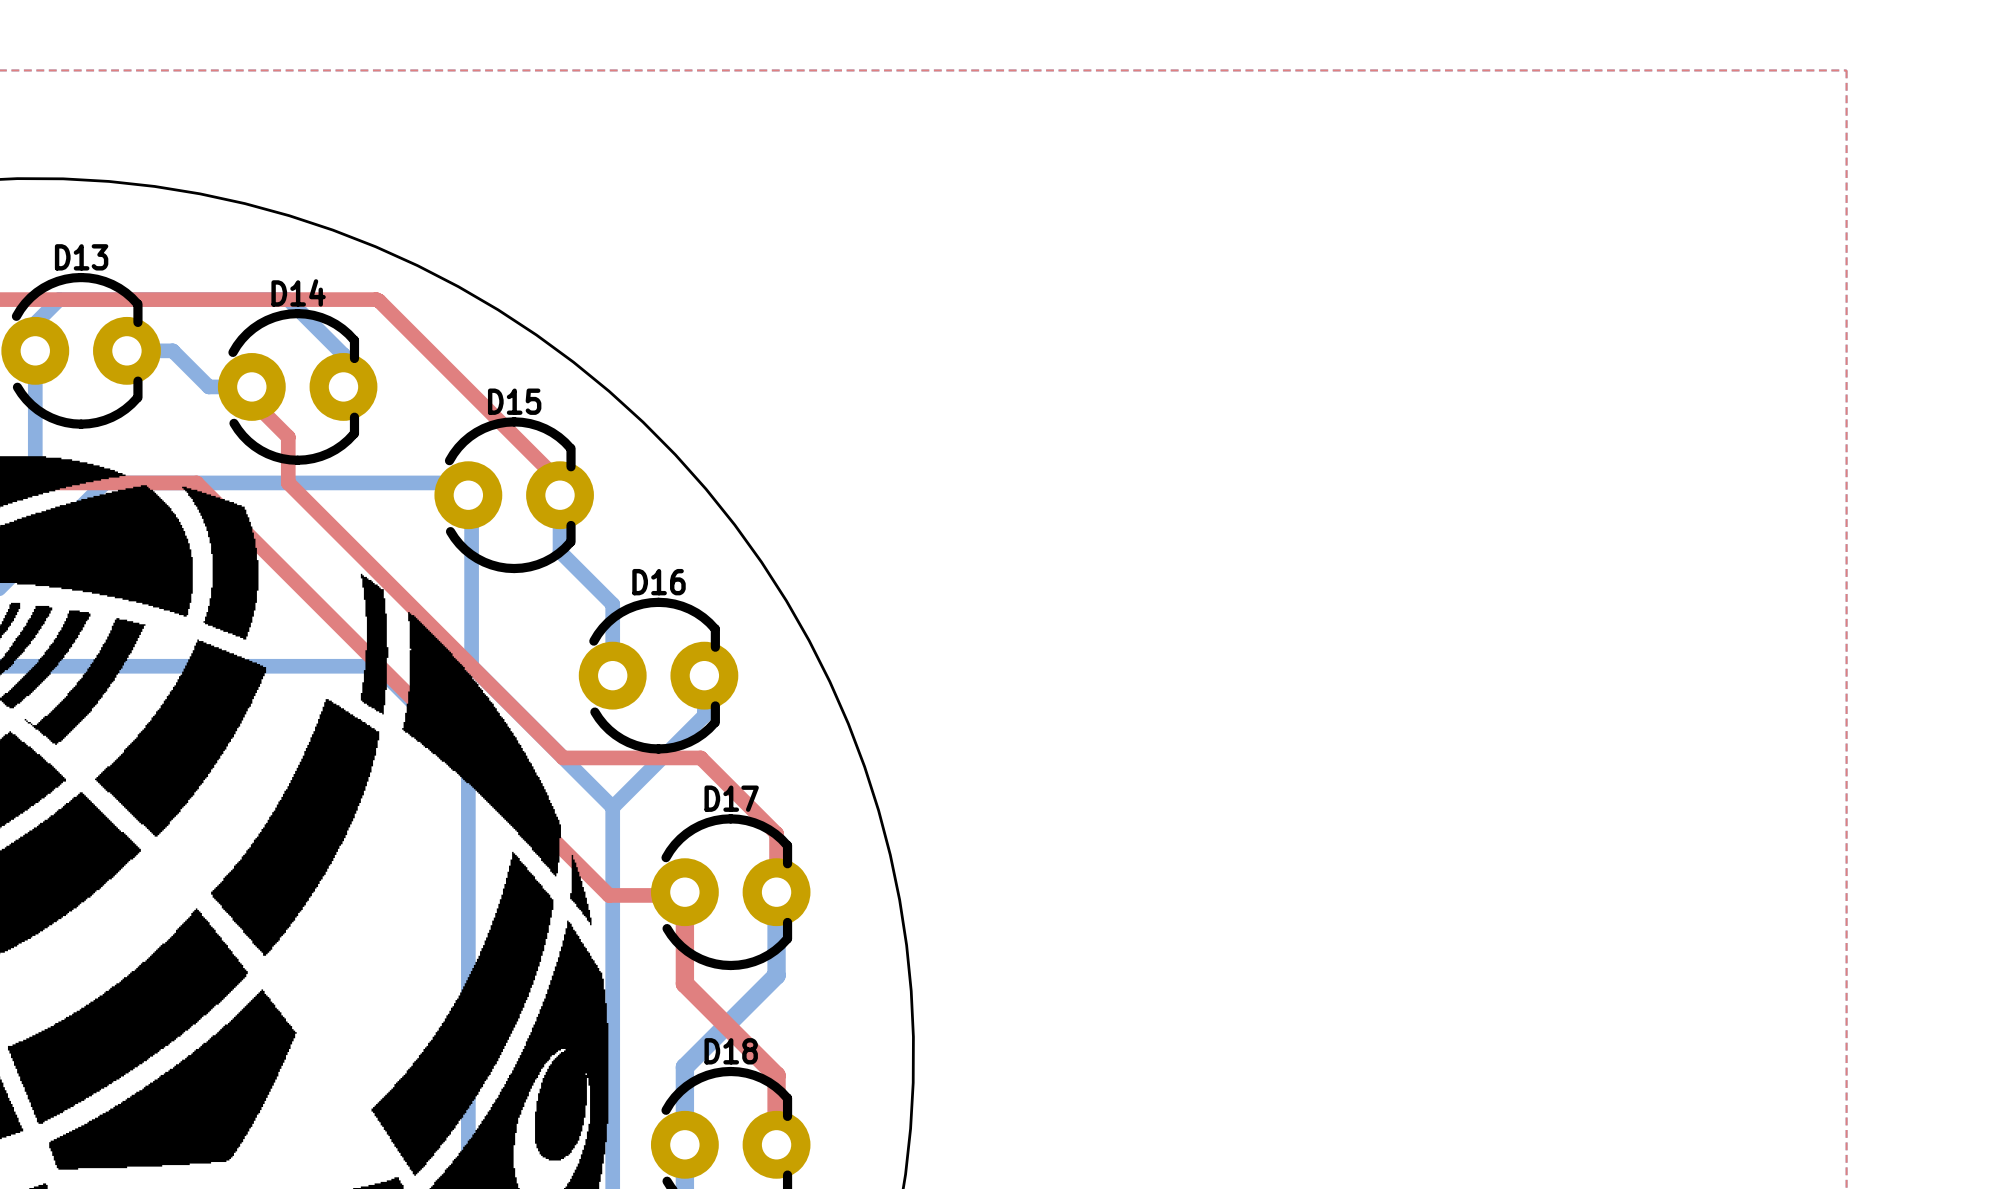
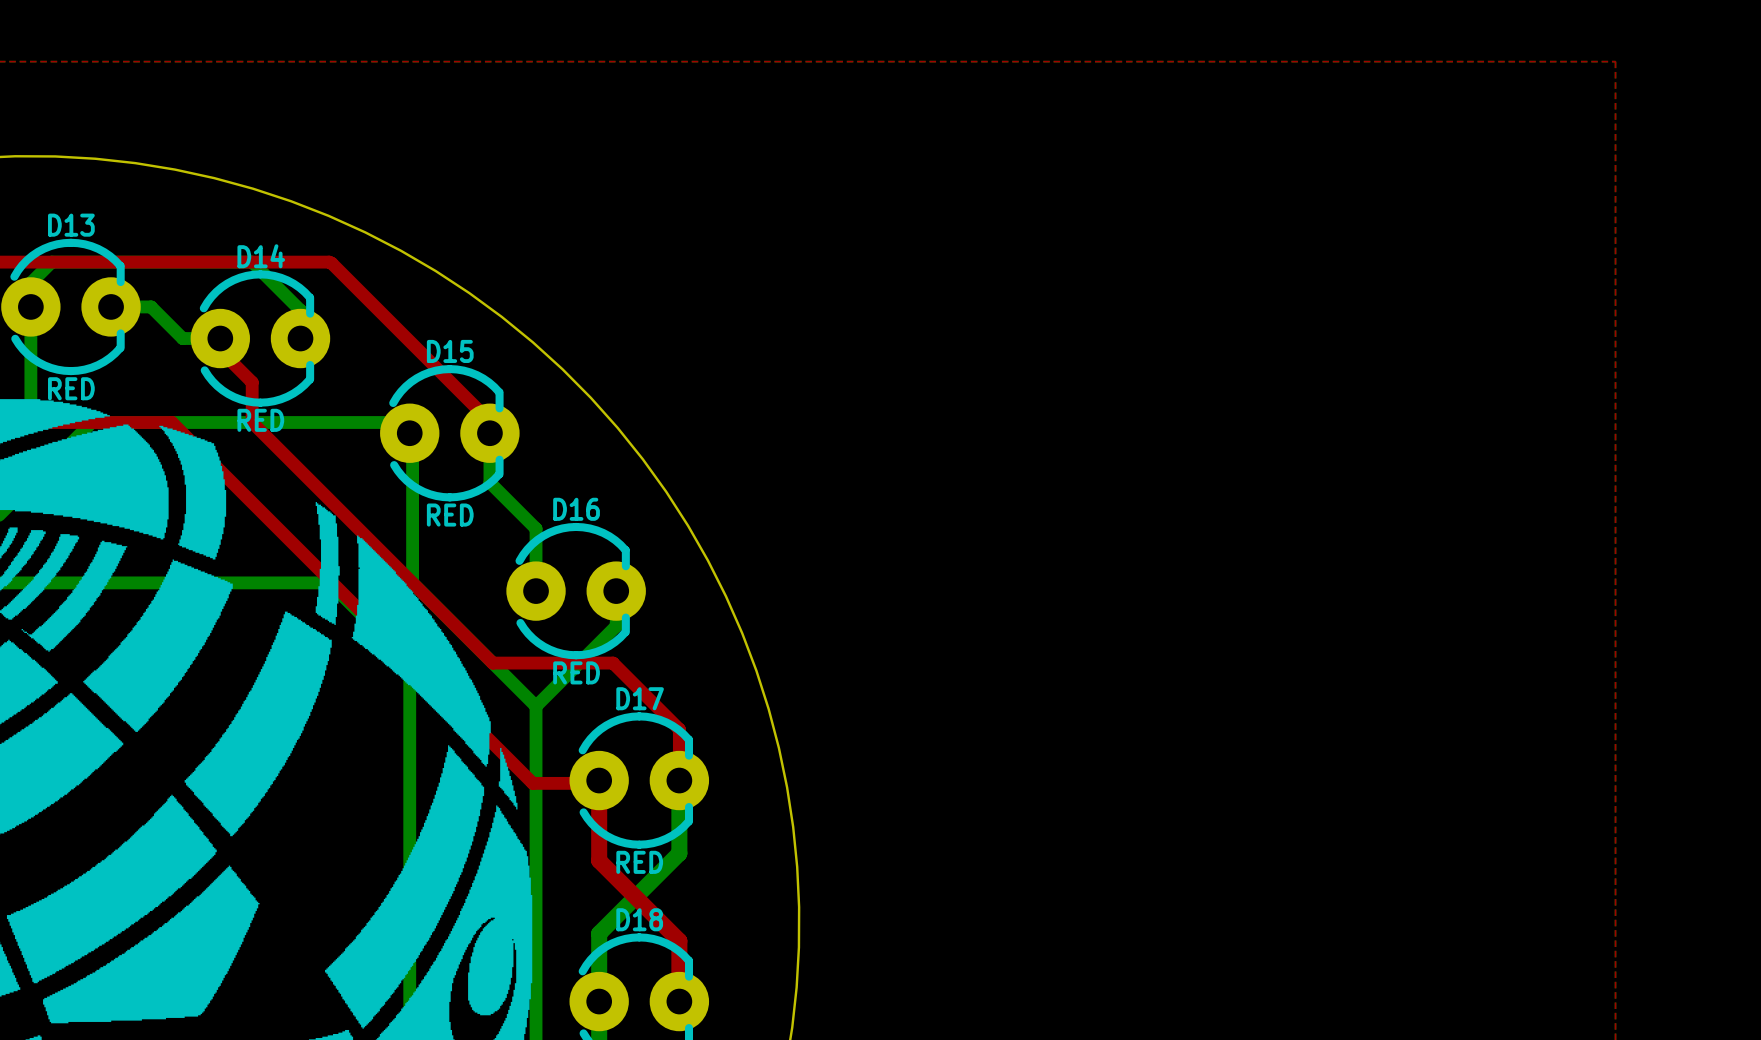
D13 value: none -> RED (71, 388)
D14 value: none -> RED (260, 420)
D15 value: none -> RED (450, 515)
D16 value: none -> RED (576, 672)
D17 value: none -> RED (639, 862)

